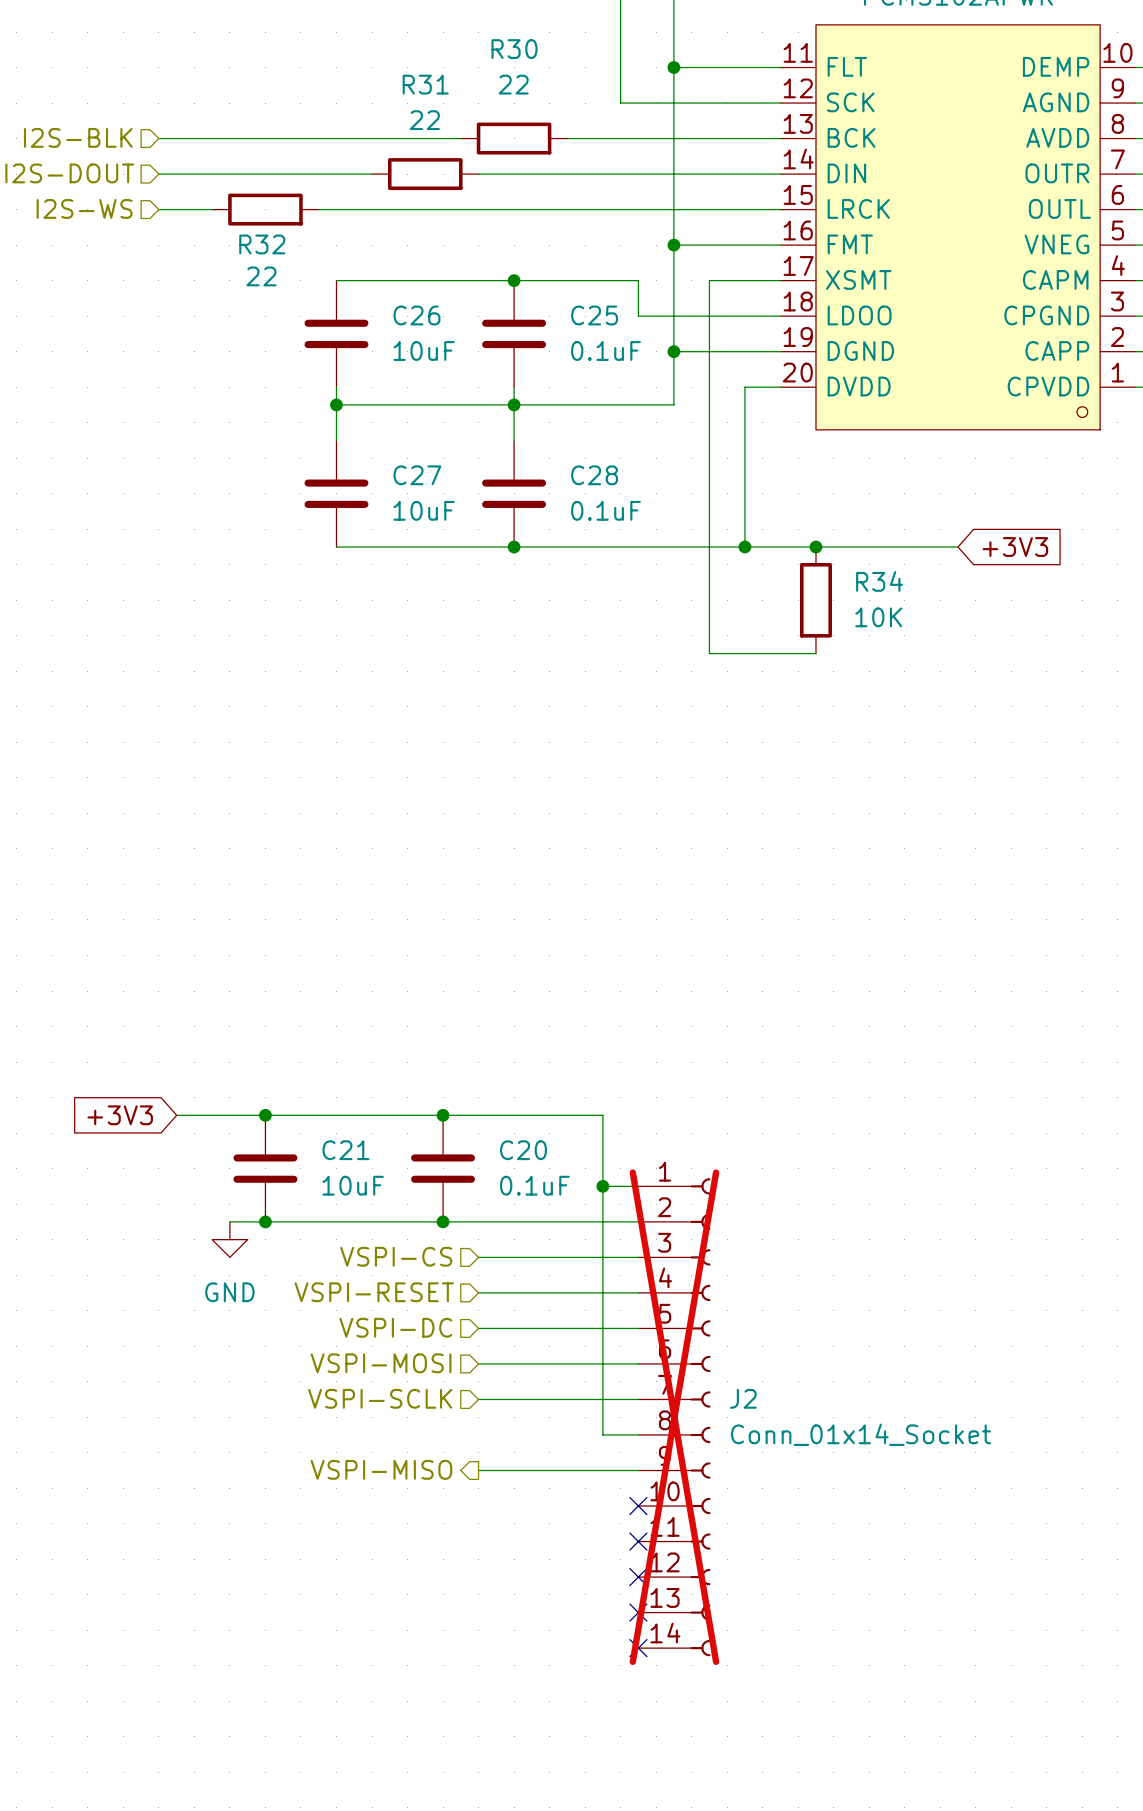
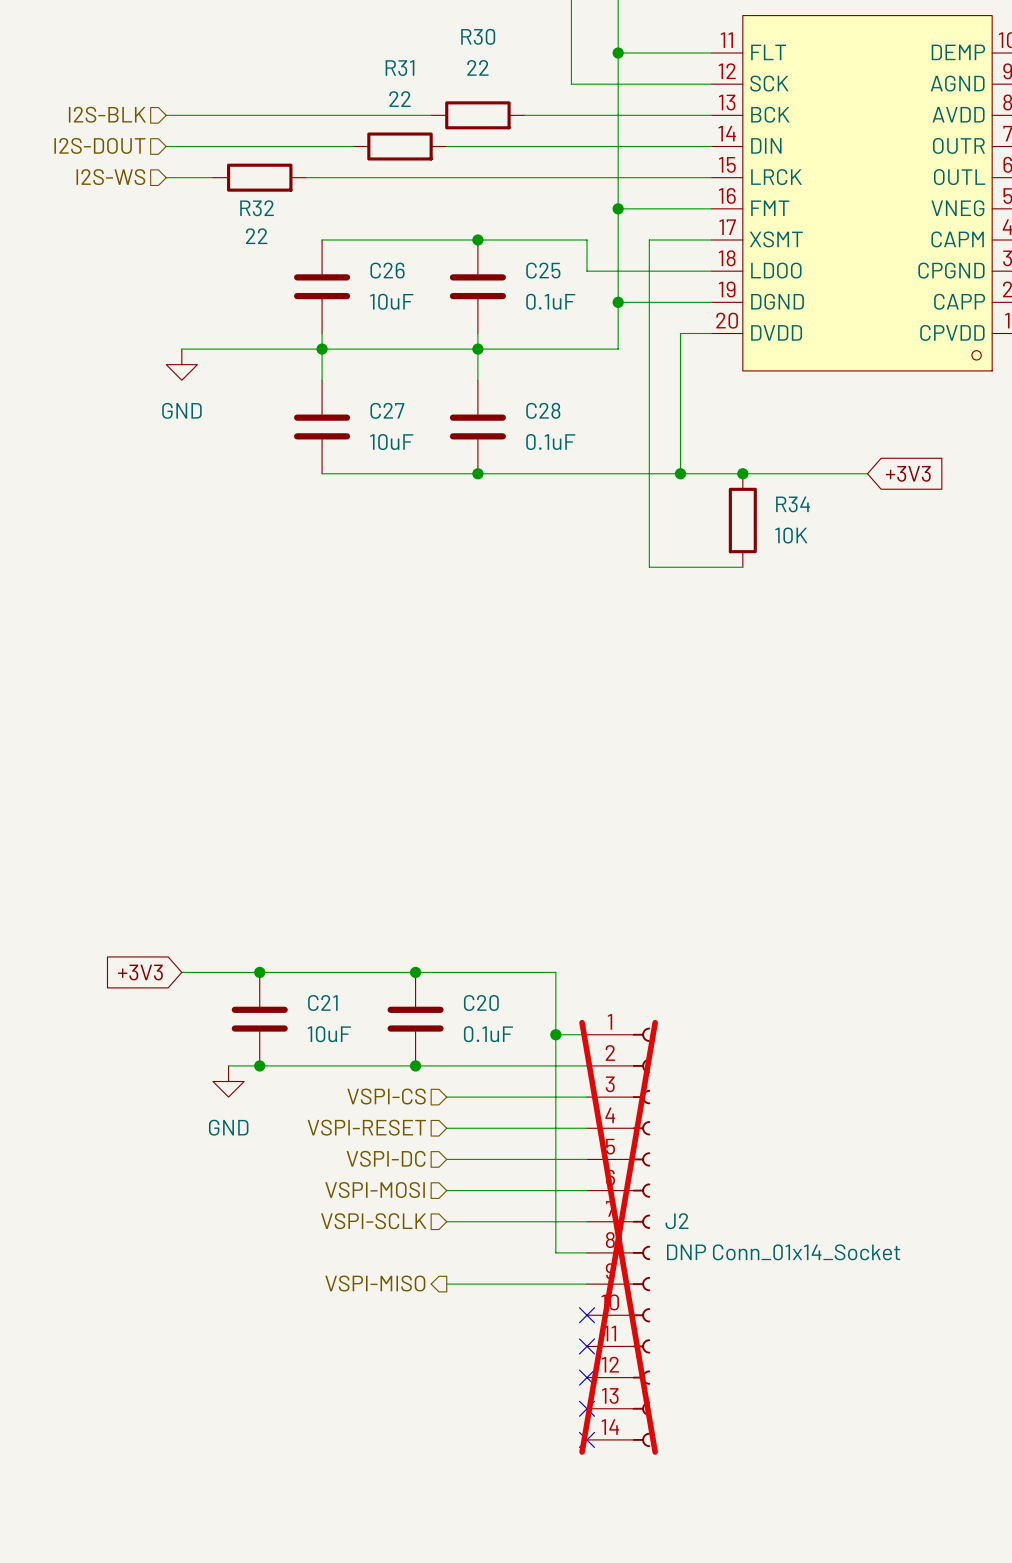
wire: none -> (181, 349) (322, 349)
power symbol: none -> GND (181, 364)
J2 value: Conn_01x14_Socket (860, 1434) -> DNP Conn_01x14_Socket (783, 1252)

